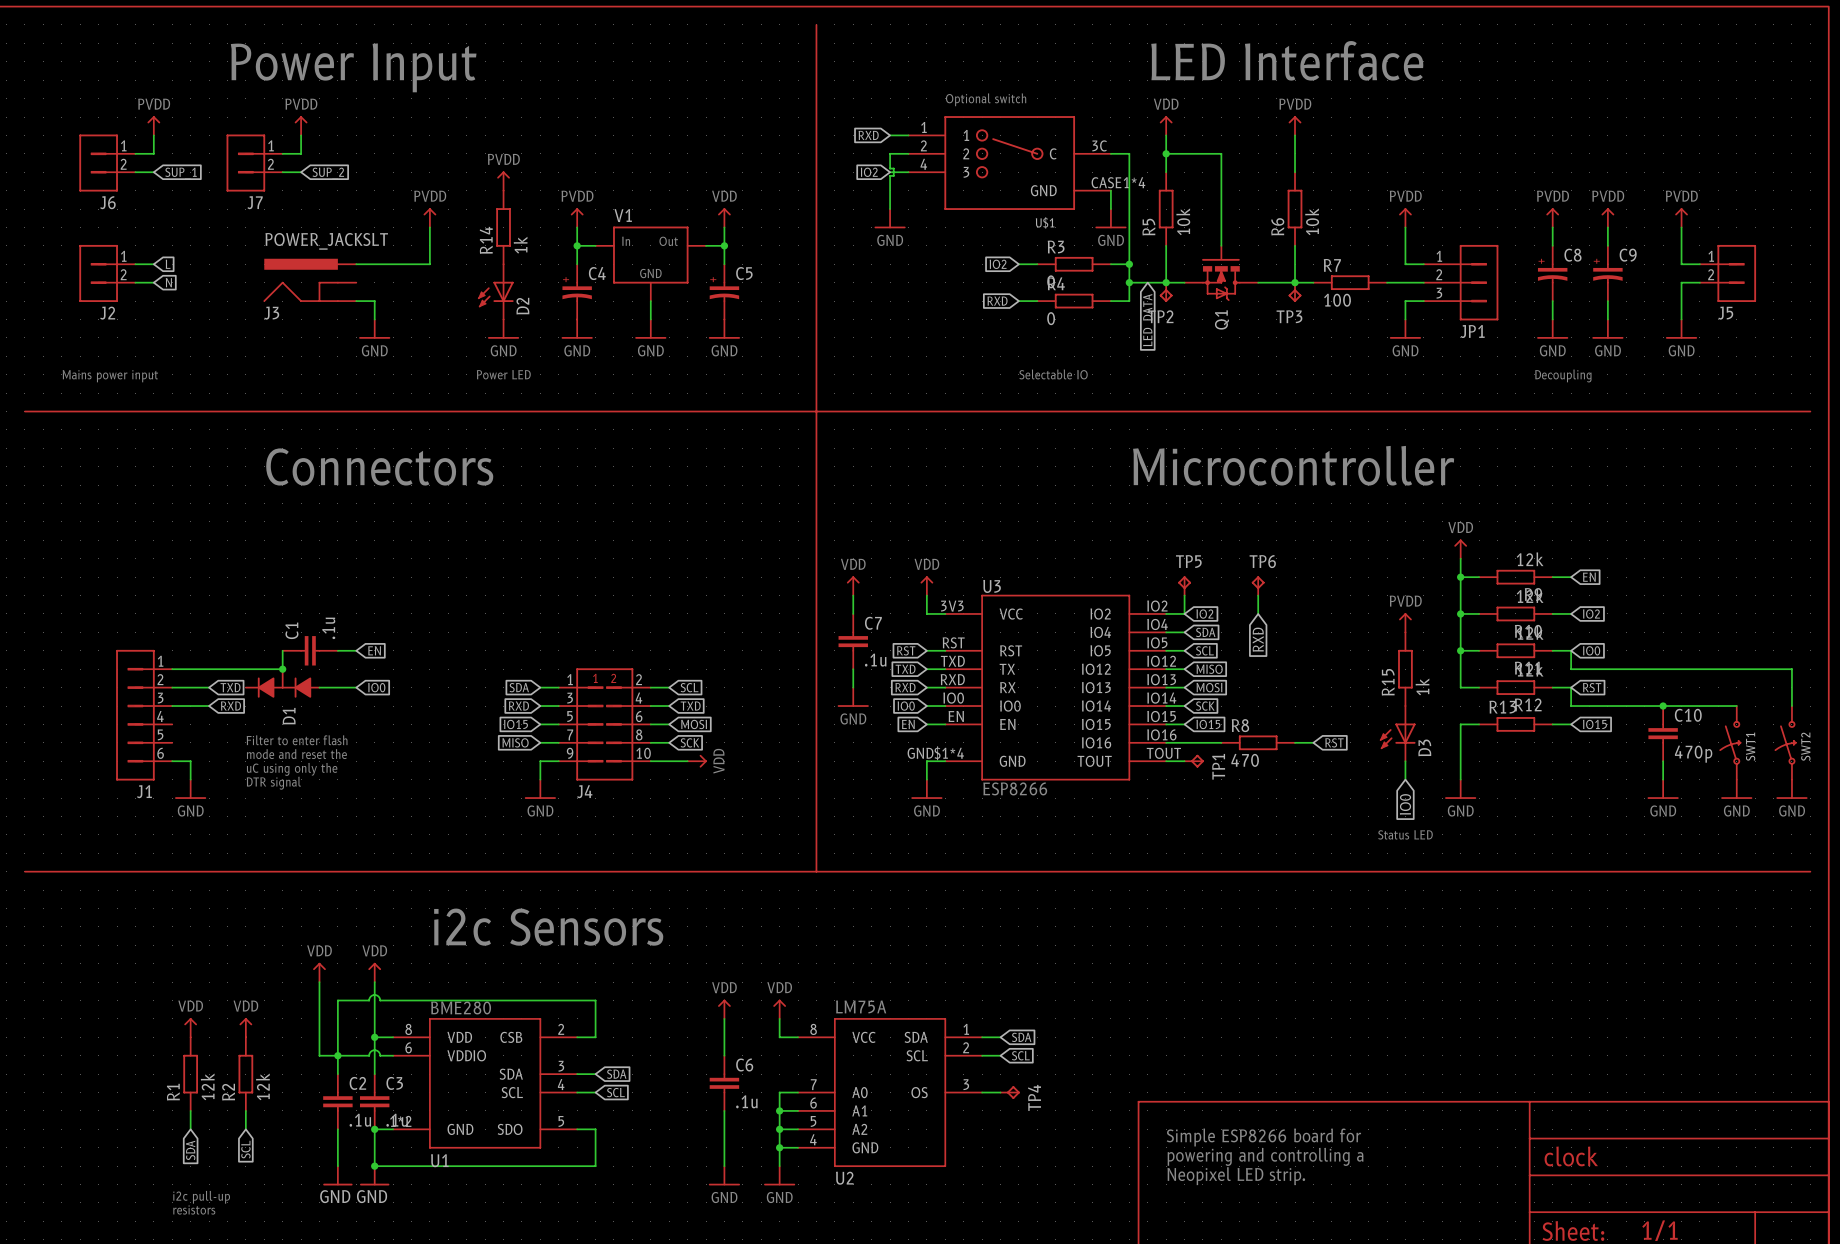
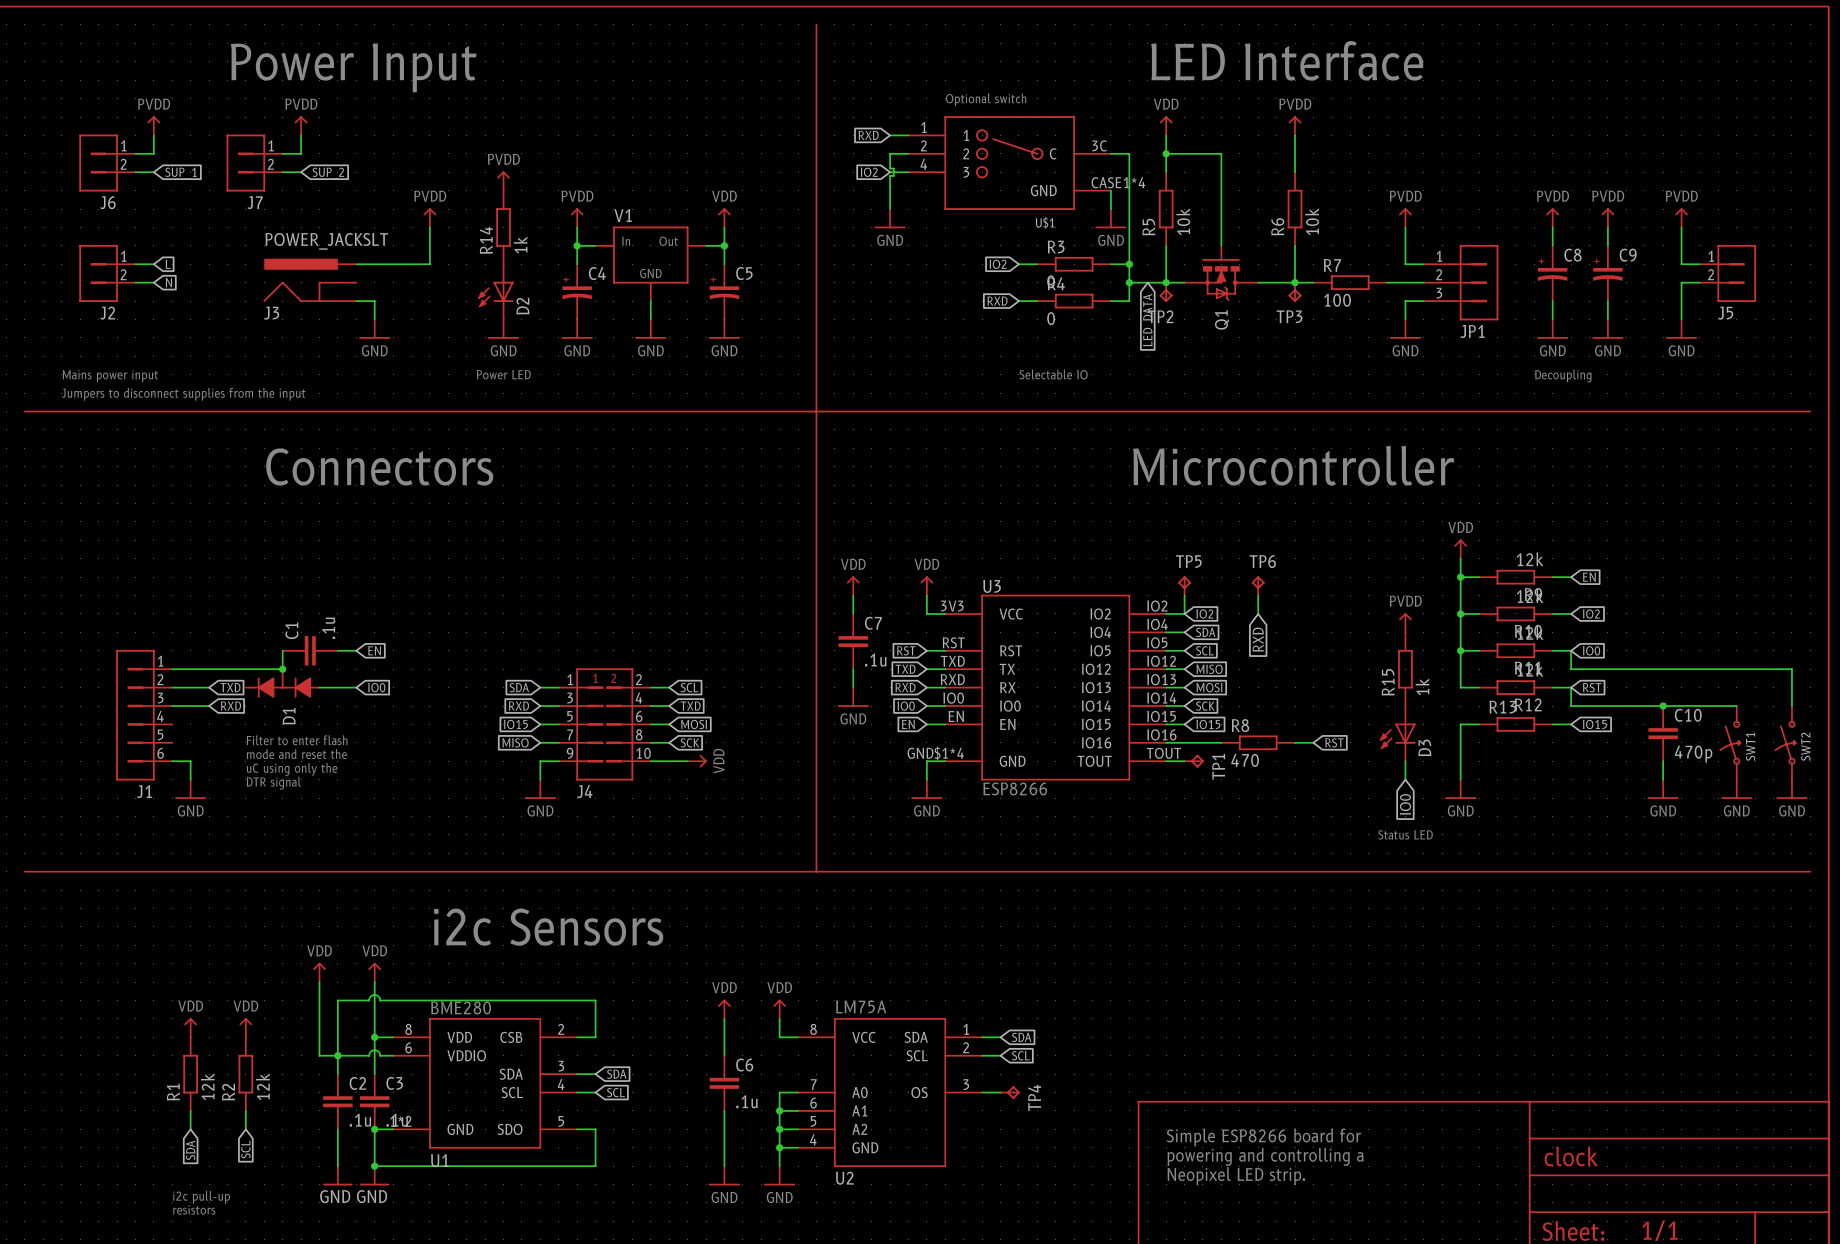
text: none -> Jumpers to disconnect supplies from the input (183, 394)

